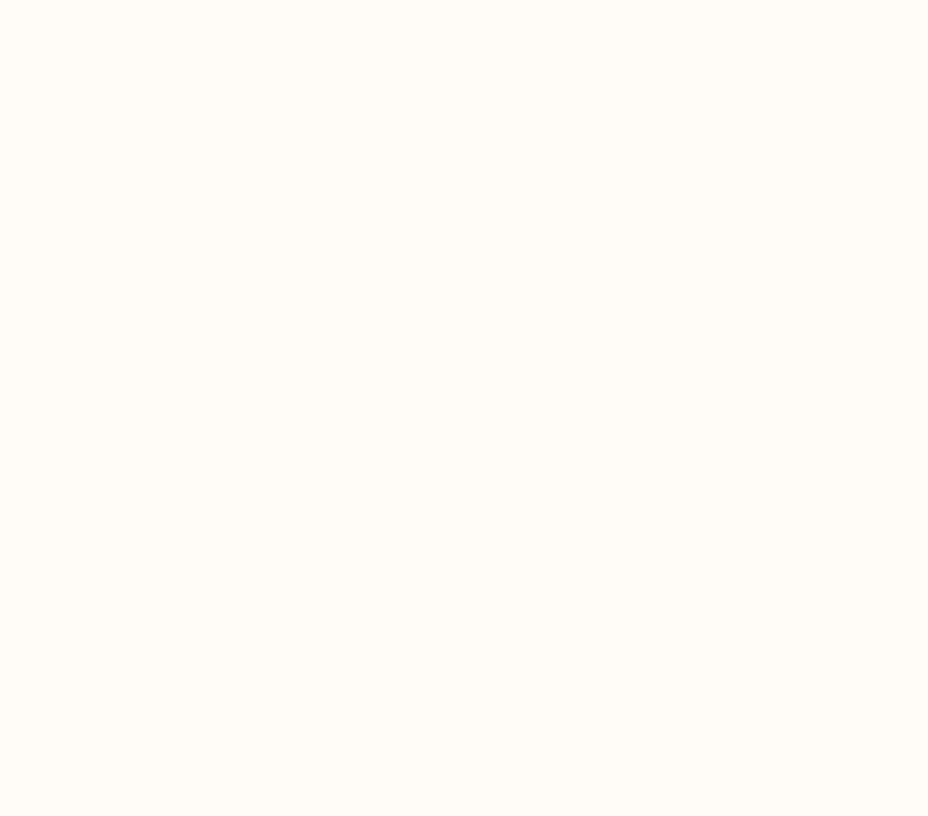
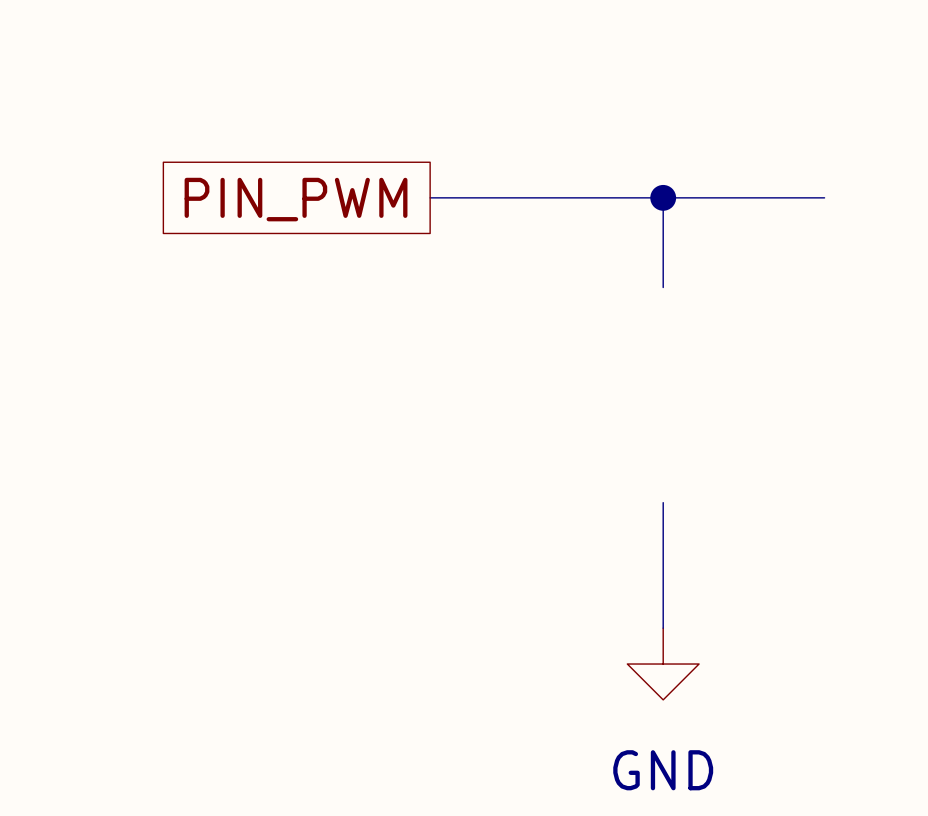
wire: none -> (430, 197) (824, 197)
wire: none -> (663, 197) (663, 287)
junction: none -> (663, 197)
global label: none -> PIN_PWM (296, 199)
wire: none -> (663, 502) (663, 628)
power symbol: none -> GND (663, 664)

